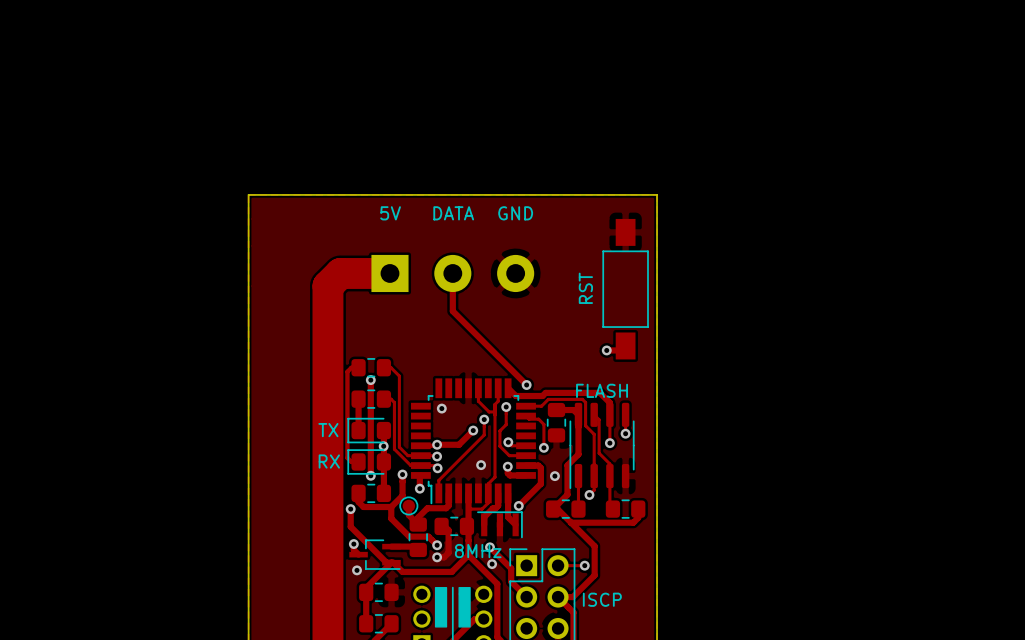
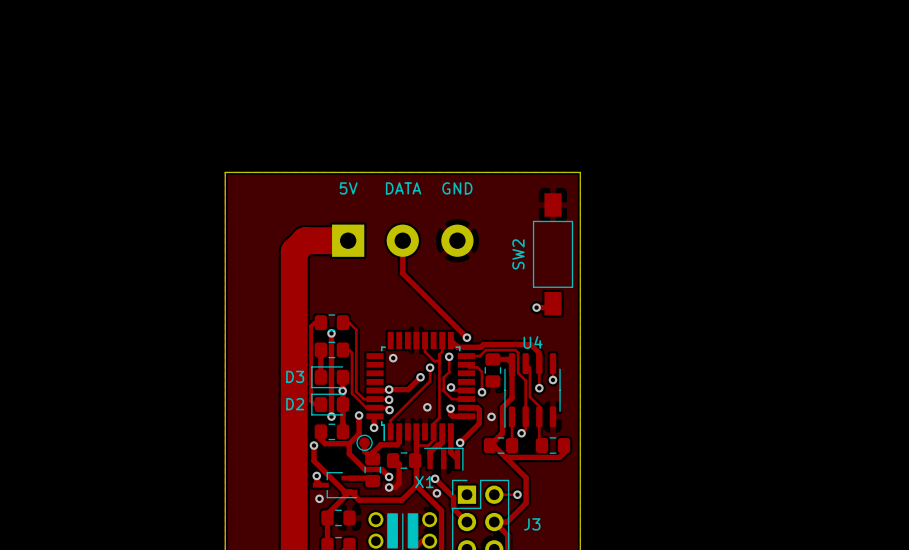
RST name: RST (585, 288) -> SW2 (518, 254)
FLASH name: FLASH (602, 390) -> U4 (533, 342)
TX name: TX (328, 430) -> D3 (295, 376)
RX name: RX (329, 461) -> D2 (295, 404)
8MHz name: 8MHz (478, 551) -> X1 (424, 482)
ISCP name: ISCP (602, 599) -> J3 (532, 524)

